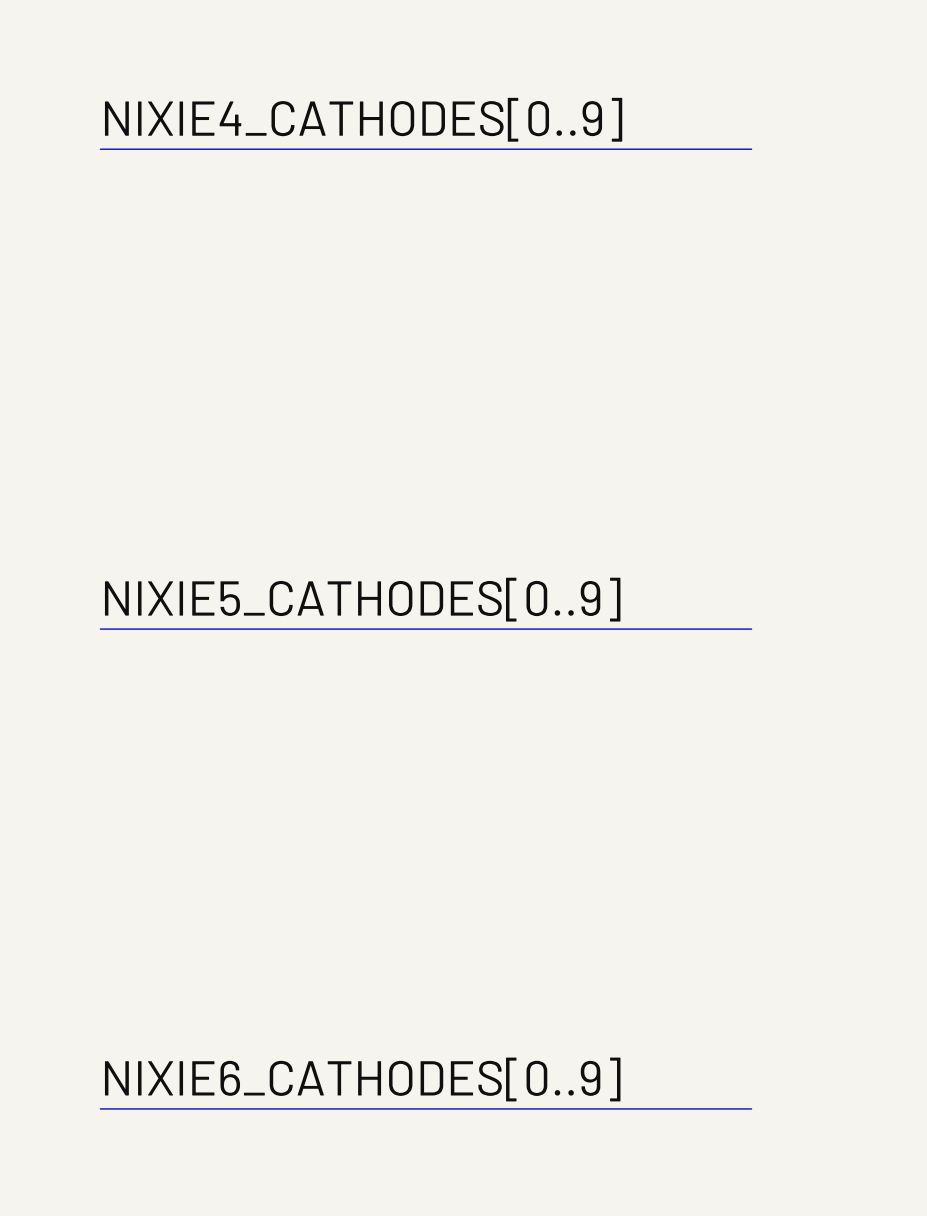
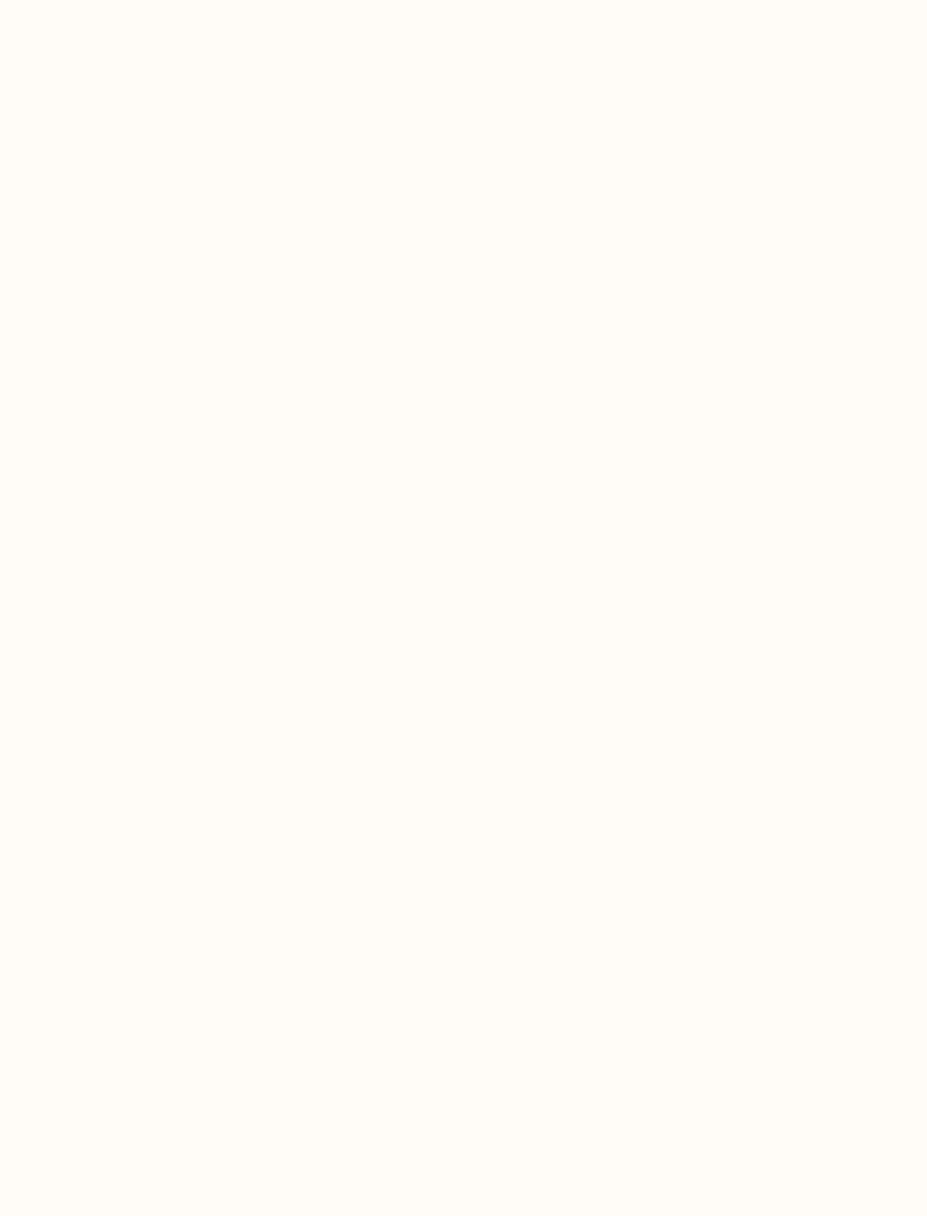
label: NIXIE4_CATHODES[0..9] (363, 119) -> none
bus: (100, 149) (751, 149) -> none
label: NIXIE5_CATHODES[0..9] (362, 599) -> none
bus: (100, 629) (751, 629) -> none
label: NIXIE6_CATHODES[0..9] (362, 1079) -> none
bus: (100, 1108) (751, 1108) -> none

